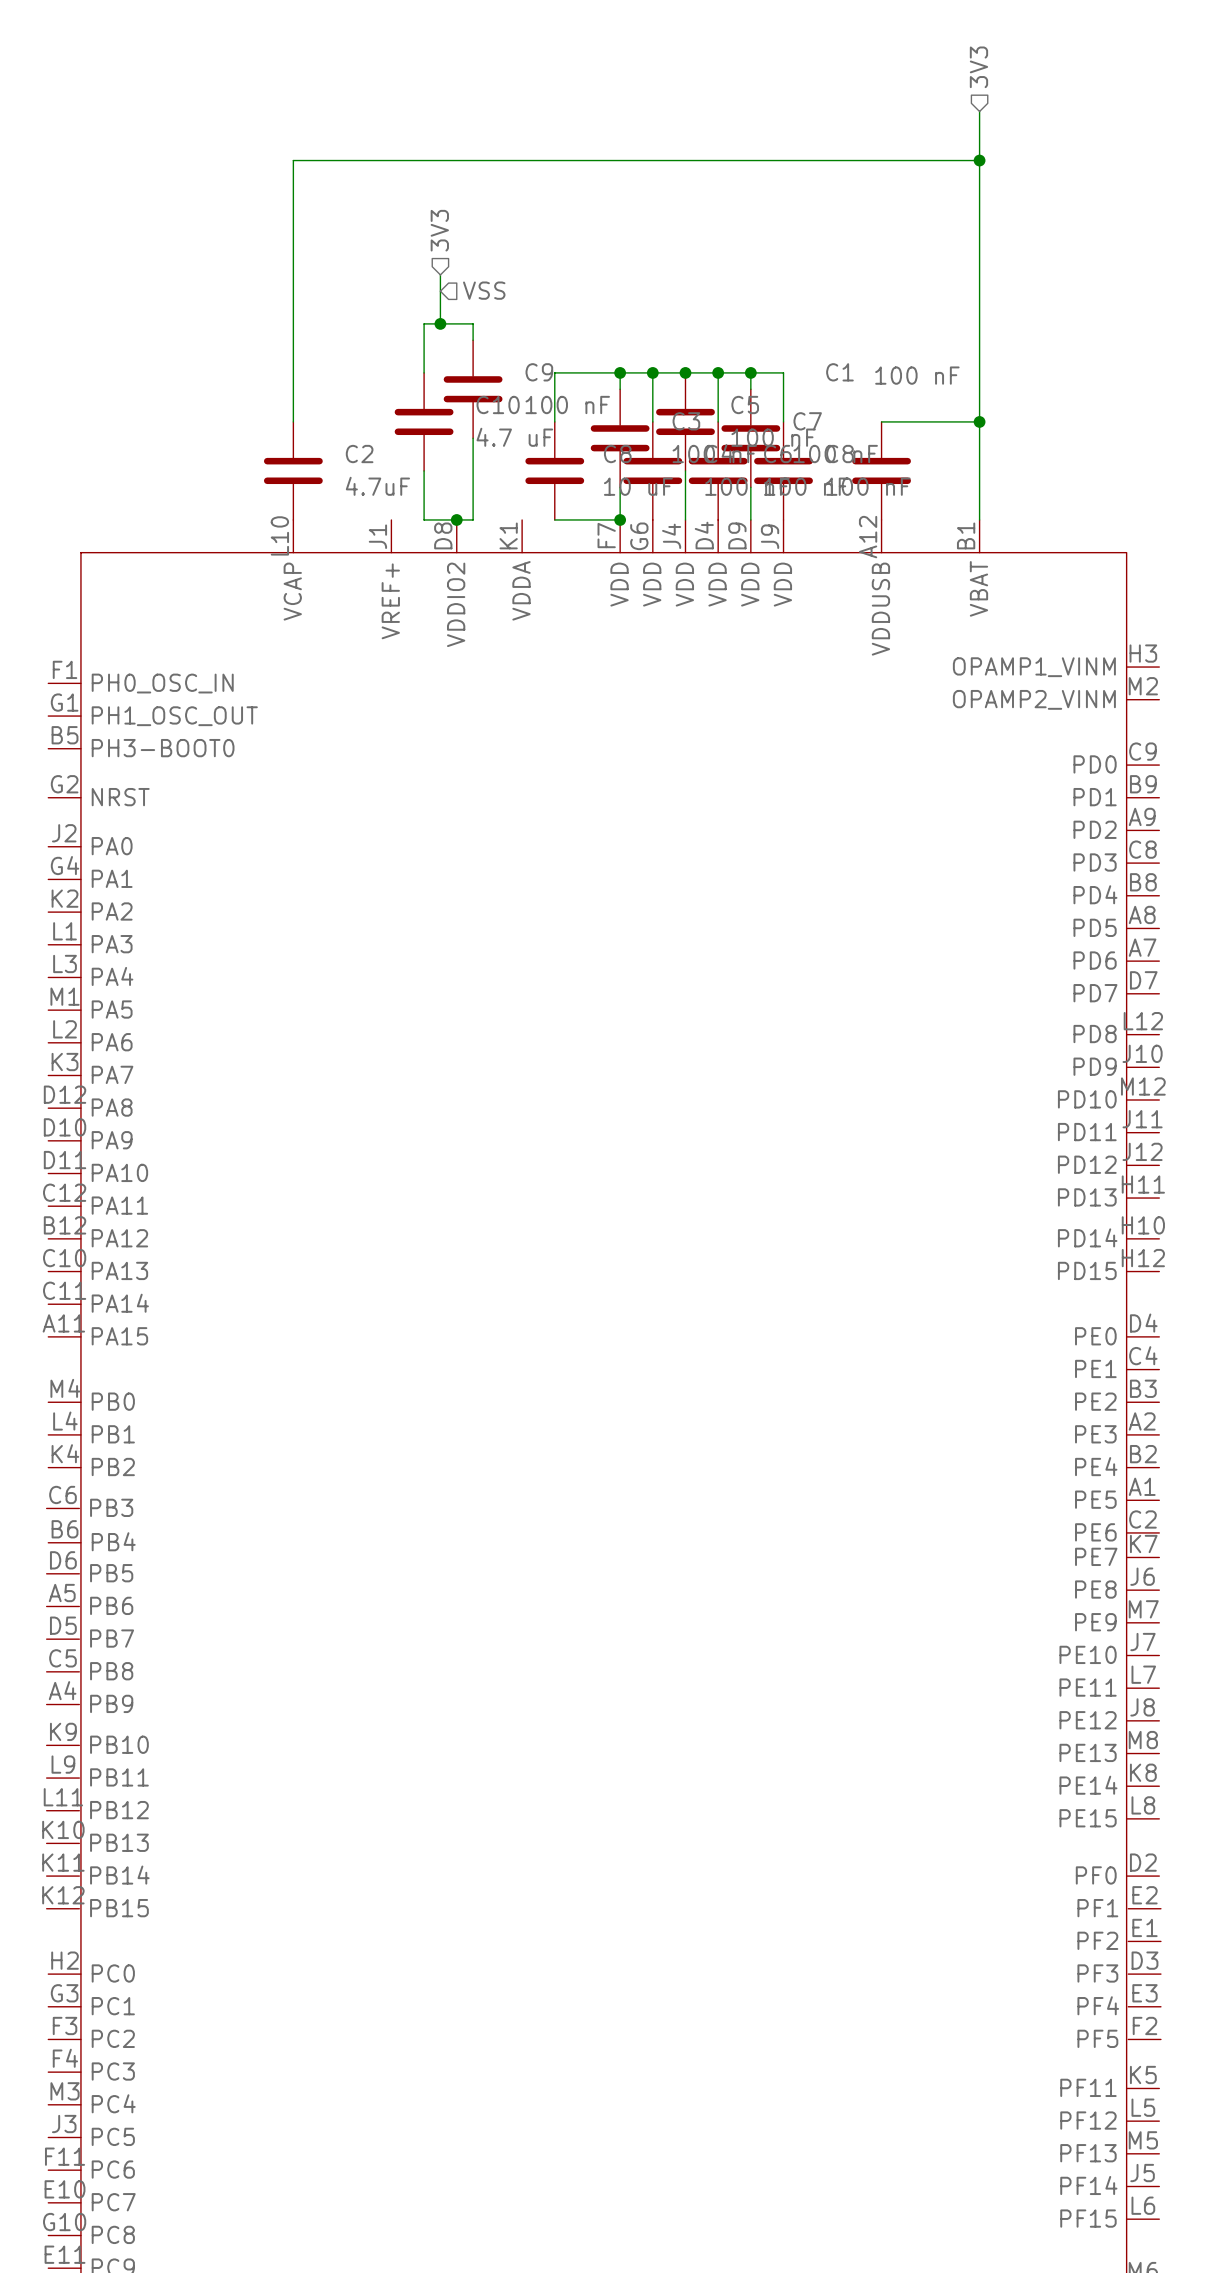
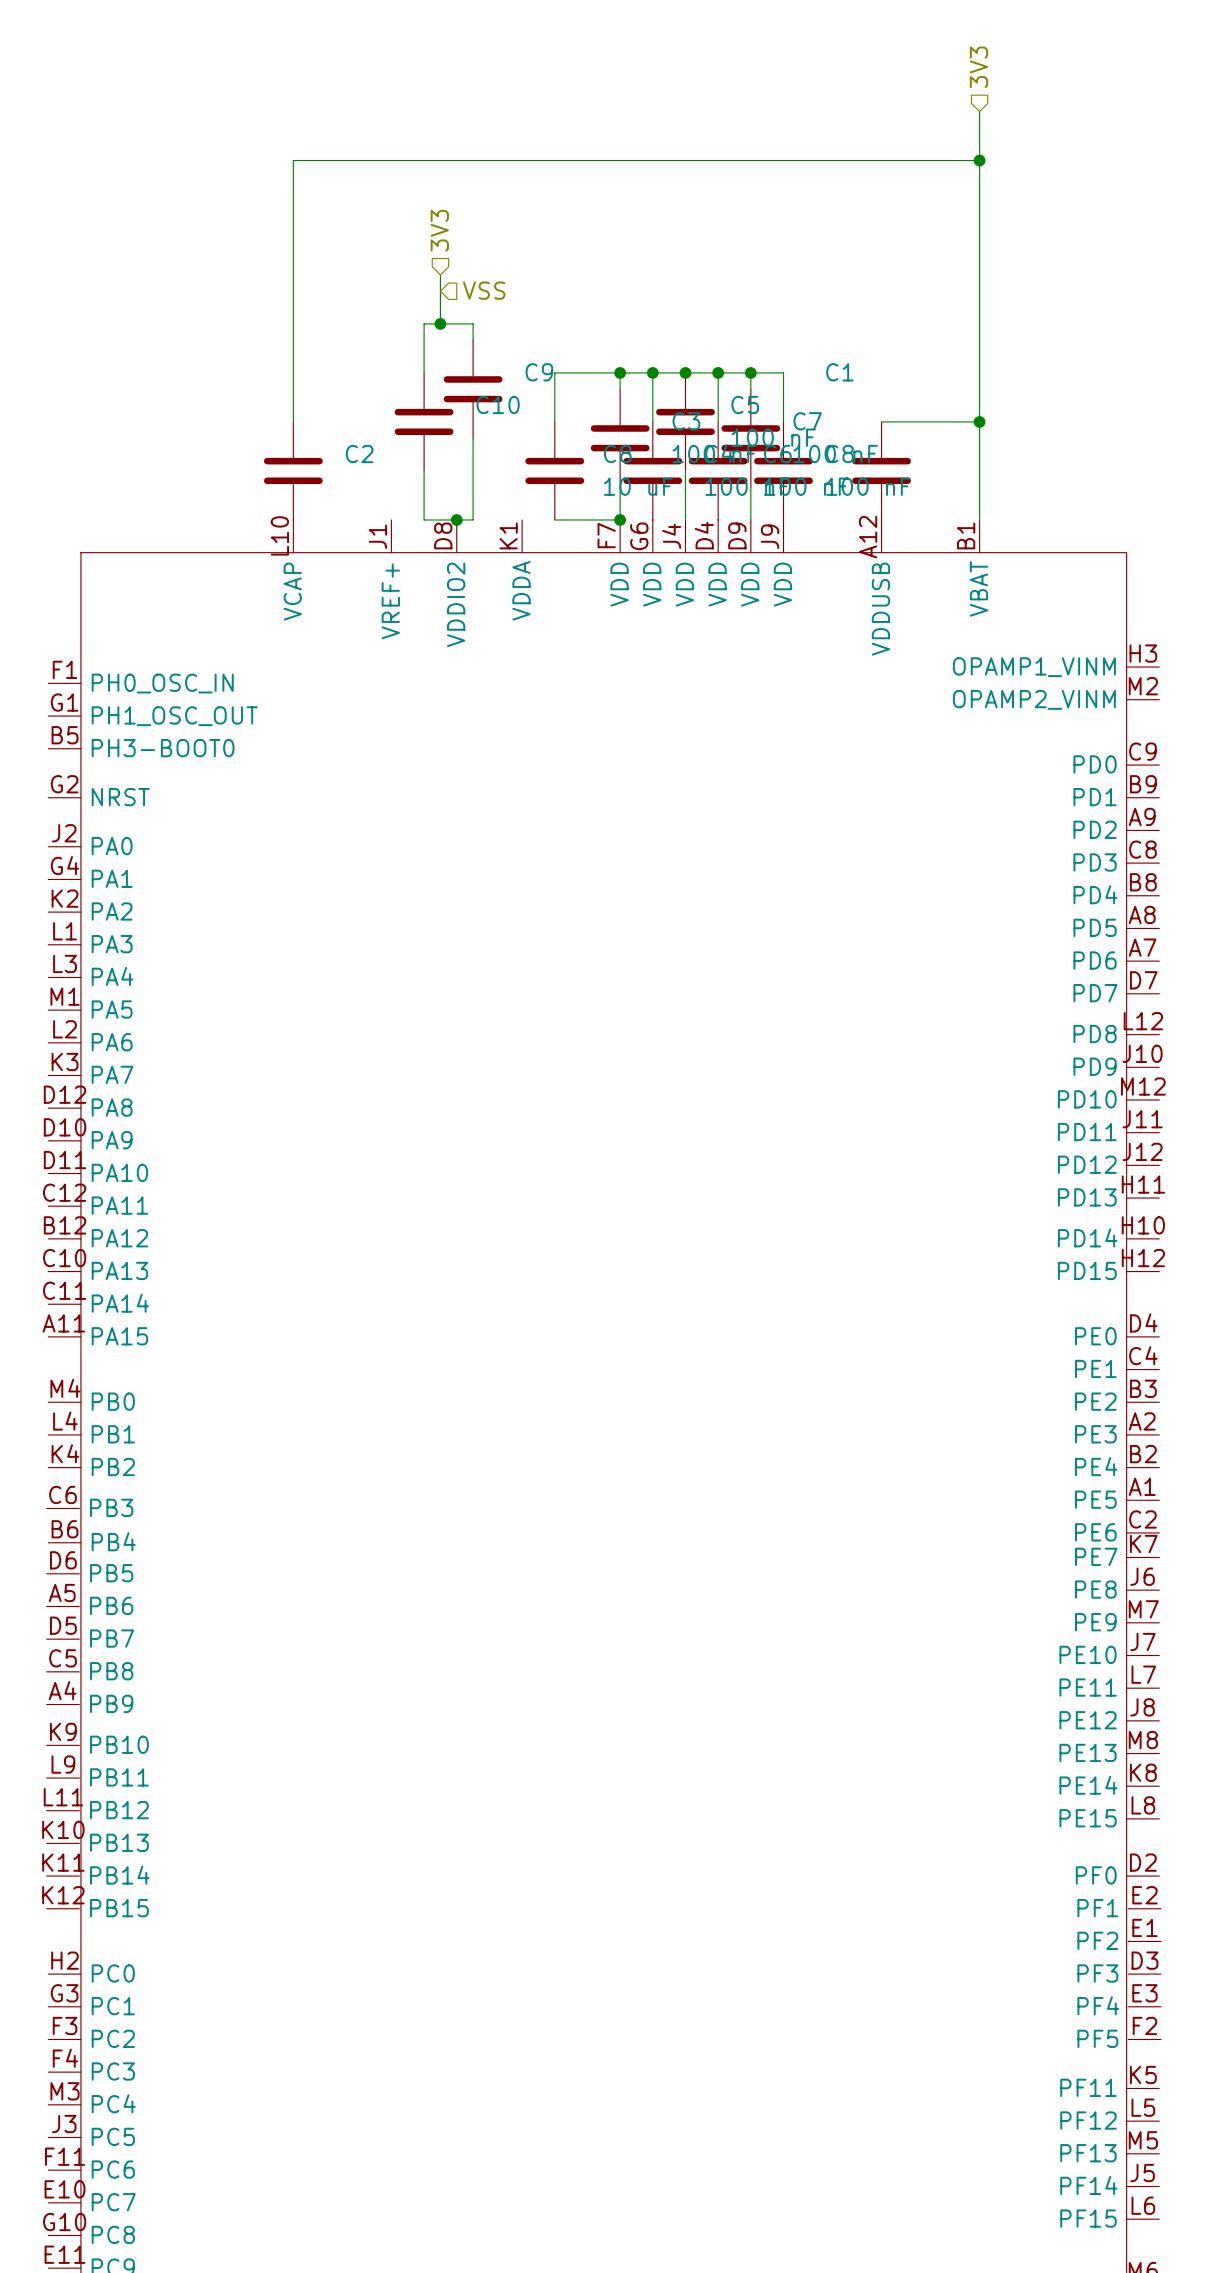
C1 value: 100 nF (917, 375) -> none
C9 value: 100 nF (567, 405) -> none
C10 value: 4.7 uF (514, 437) -> none
C2 value: 4.7uF (377, 486) -> none

